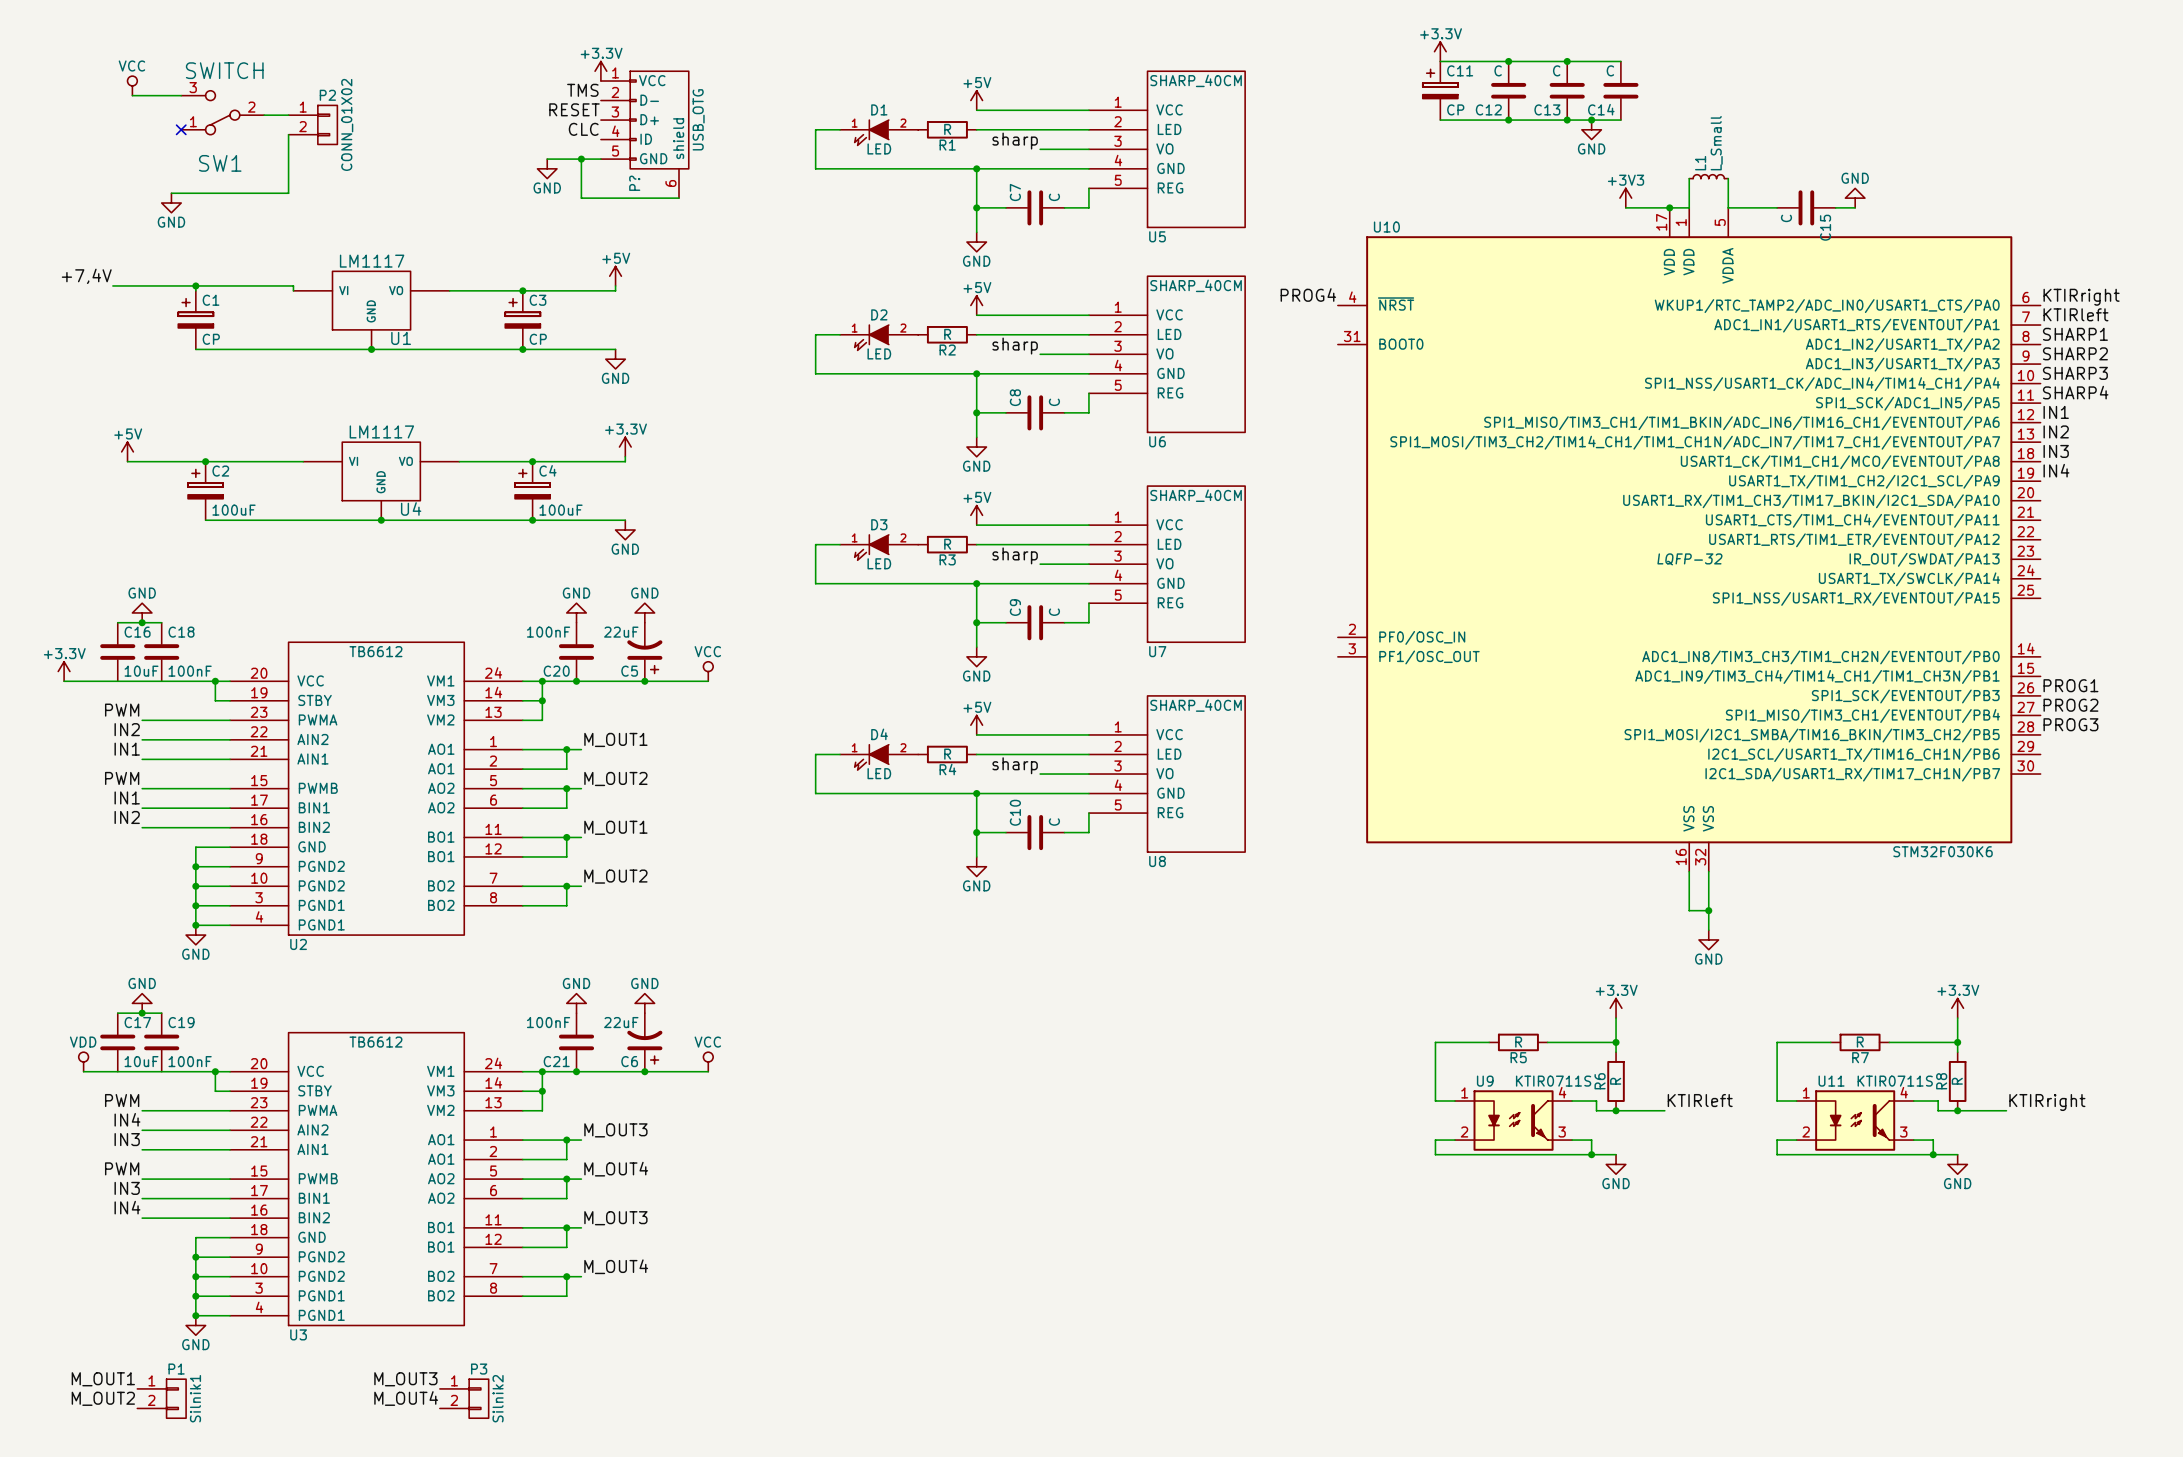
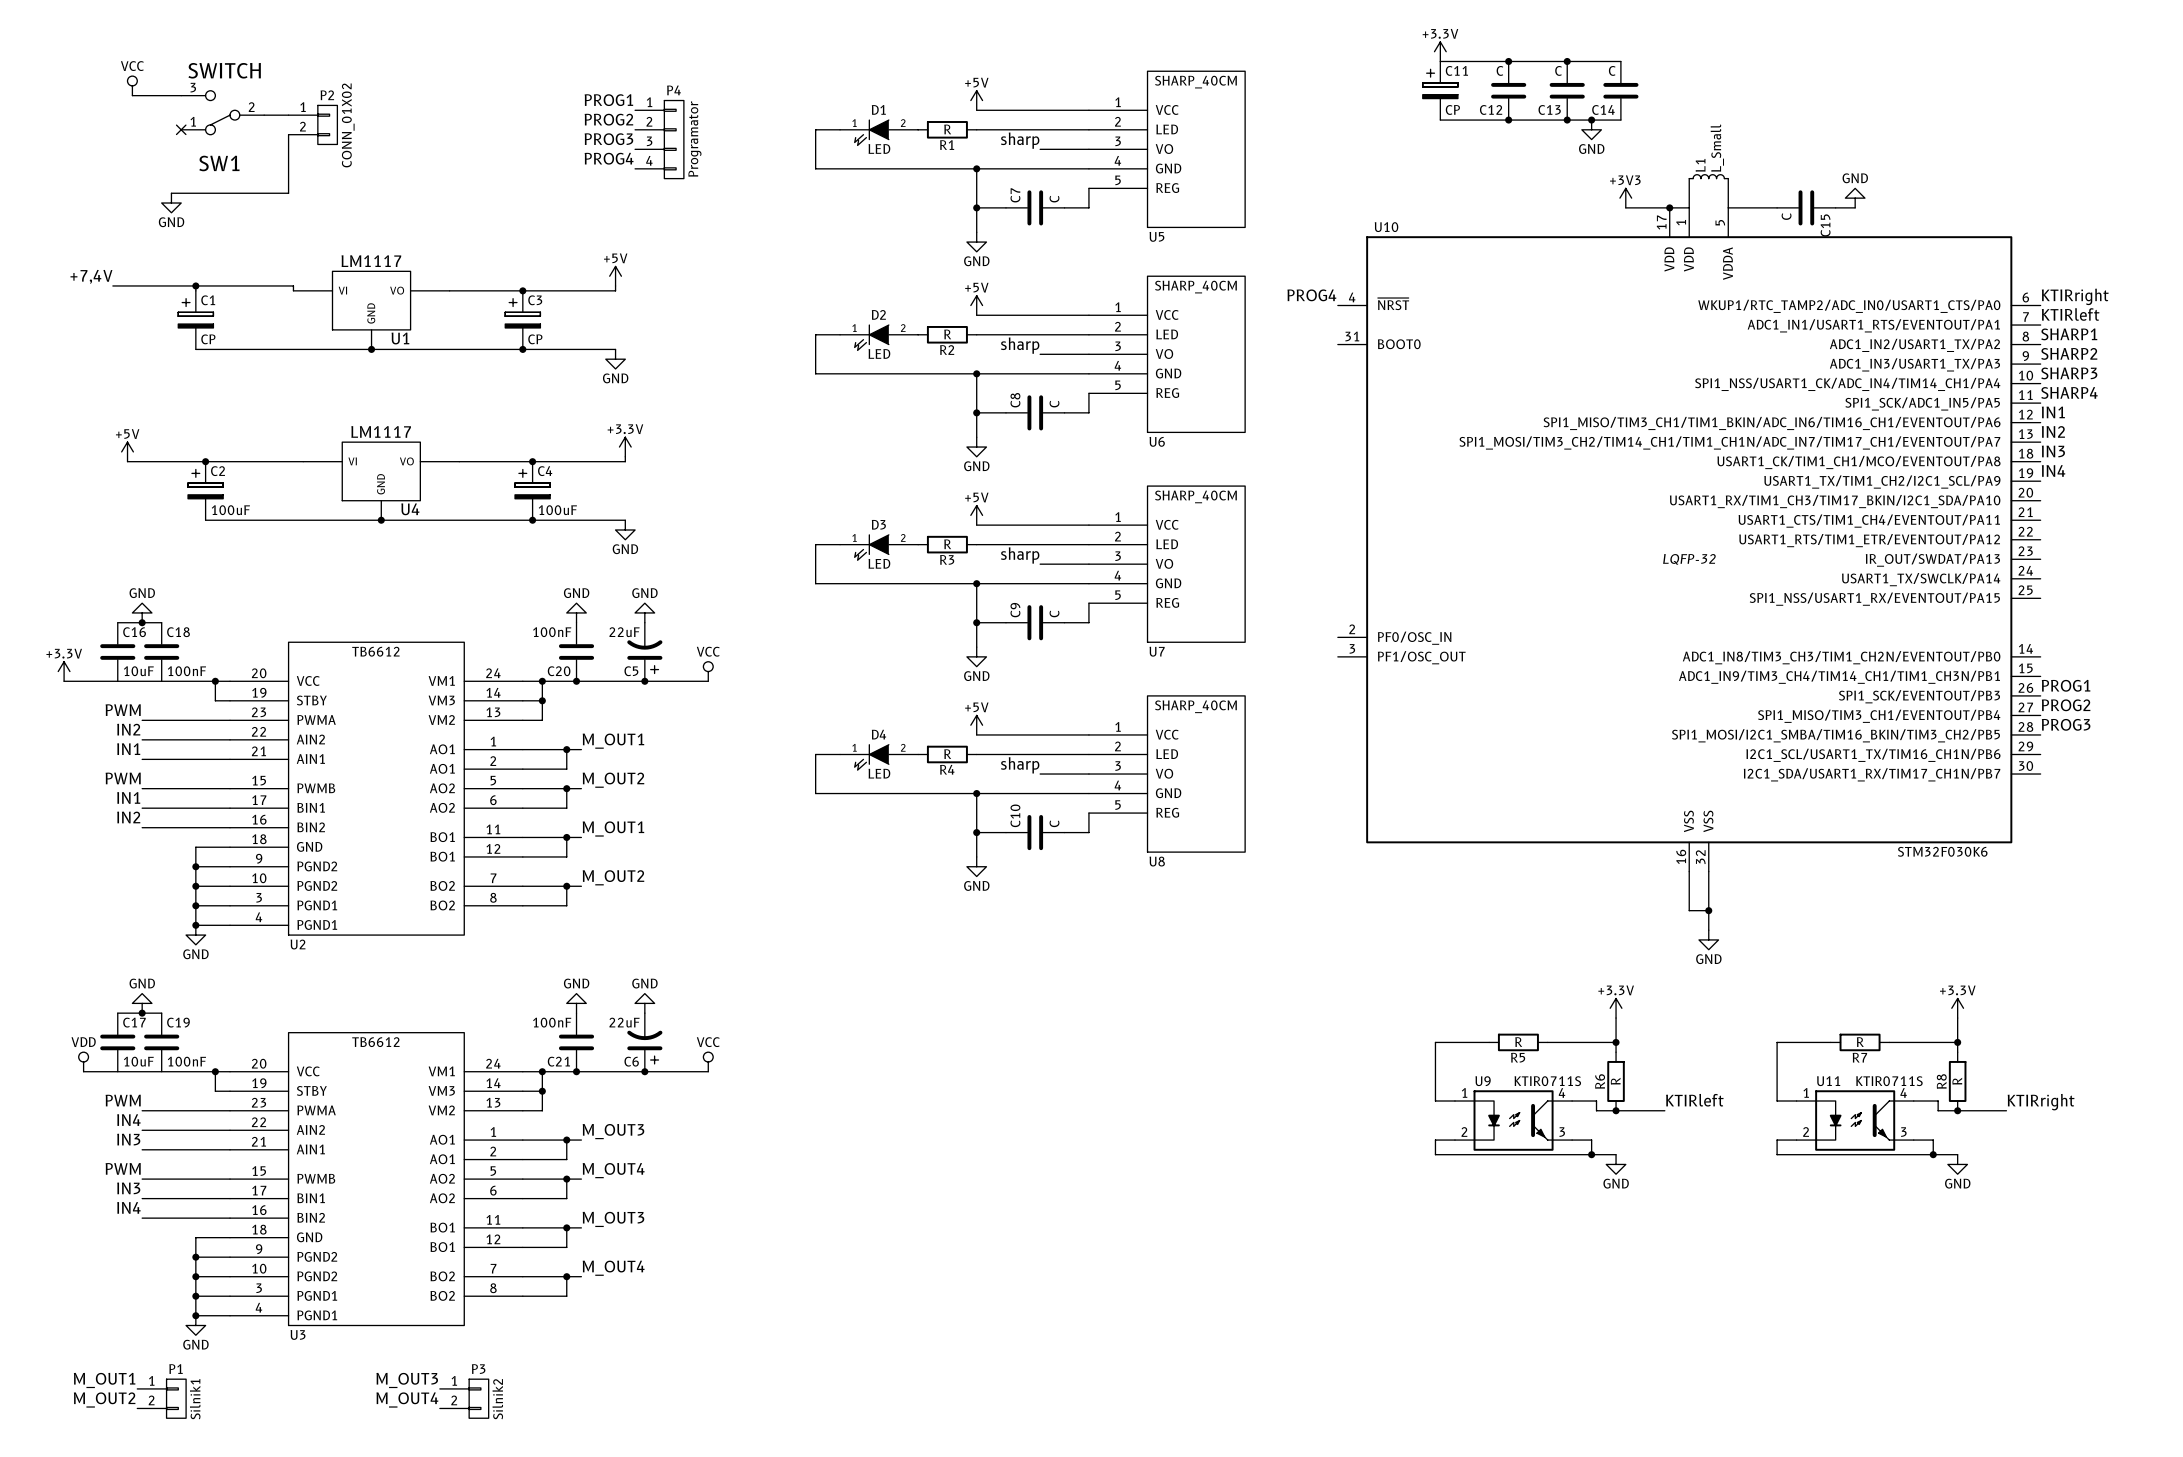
power symbol: +3.3V (600, 71) -> none
label: TMS (582, 90) -> none
label: none -> PROG1 (608, 100)
label: RESET (574, 109) -> none
label: none -> PROG2 (608, 119)
label: CLC (583, 129) -> none
P?: USB_OTG (644, 134) -> none
label: none -> PROG3 (608, 139)
P4: none -> Programator (659, 139)
label: none -> PROG4 (609, 158)
wire: (547, 159) (600, 159) -> none
wire: (581, 159) (581, 198) (679, 198) -> none
junction: (581, 159) -> none
power symbol: GND (547, 168) -> none

